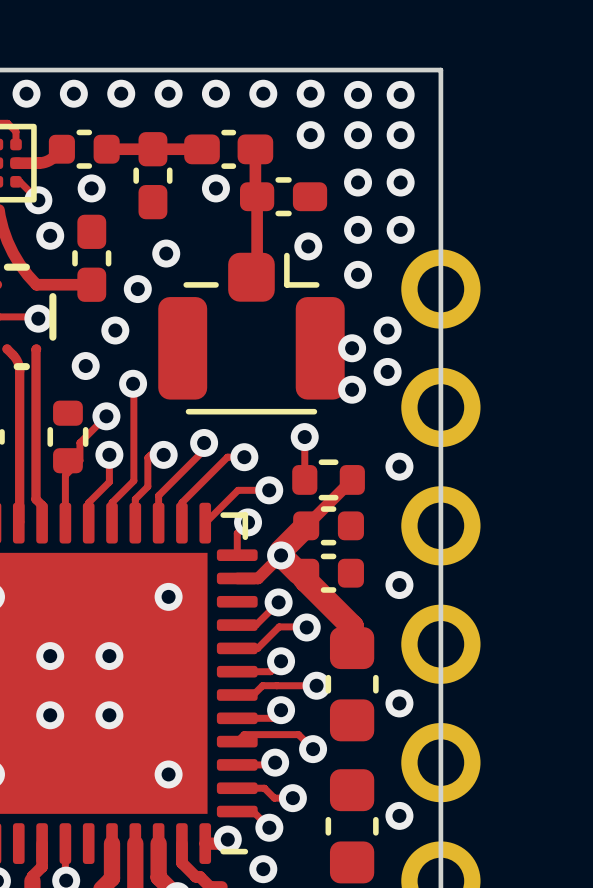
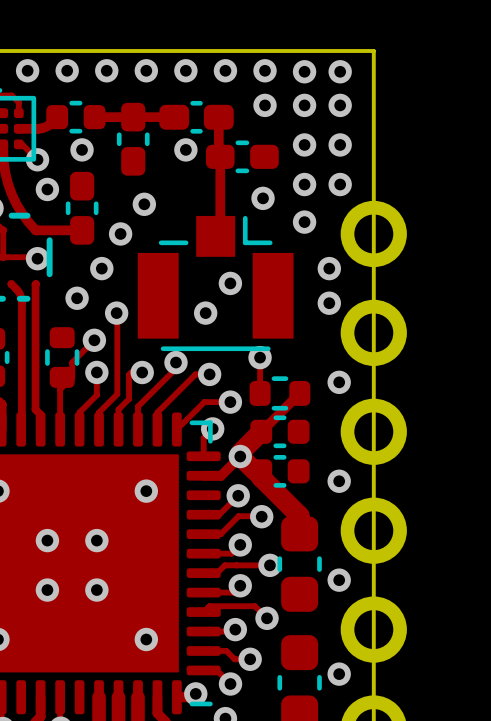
part footprint: [158, 252, 345, 415] -> [137, 215, 294, 352]
via: none -> (230, 283)
via: (352, 348) -> none
via: none -> (205, 313)
via: (352, 389) -> none

